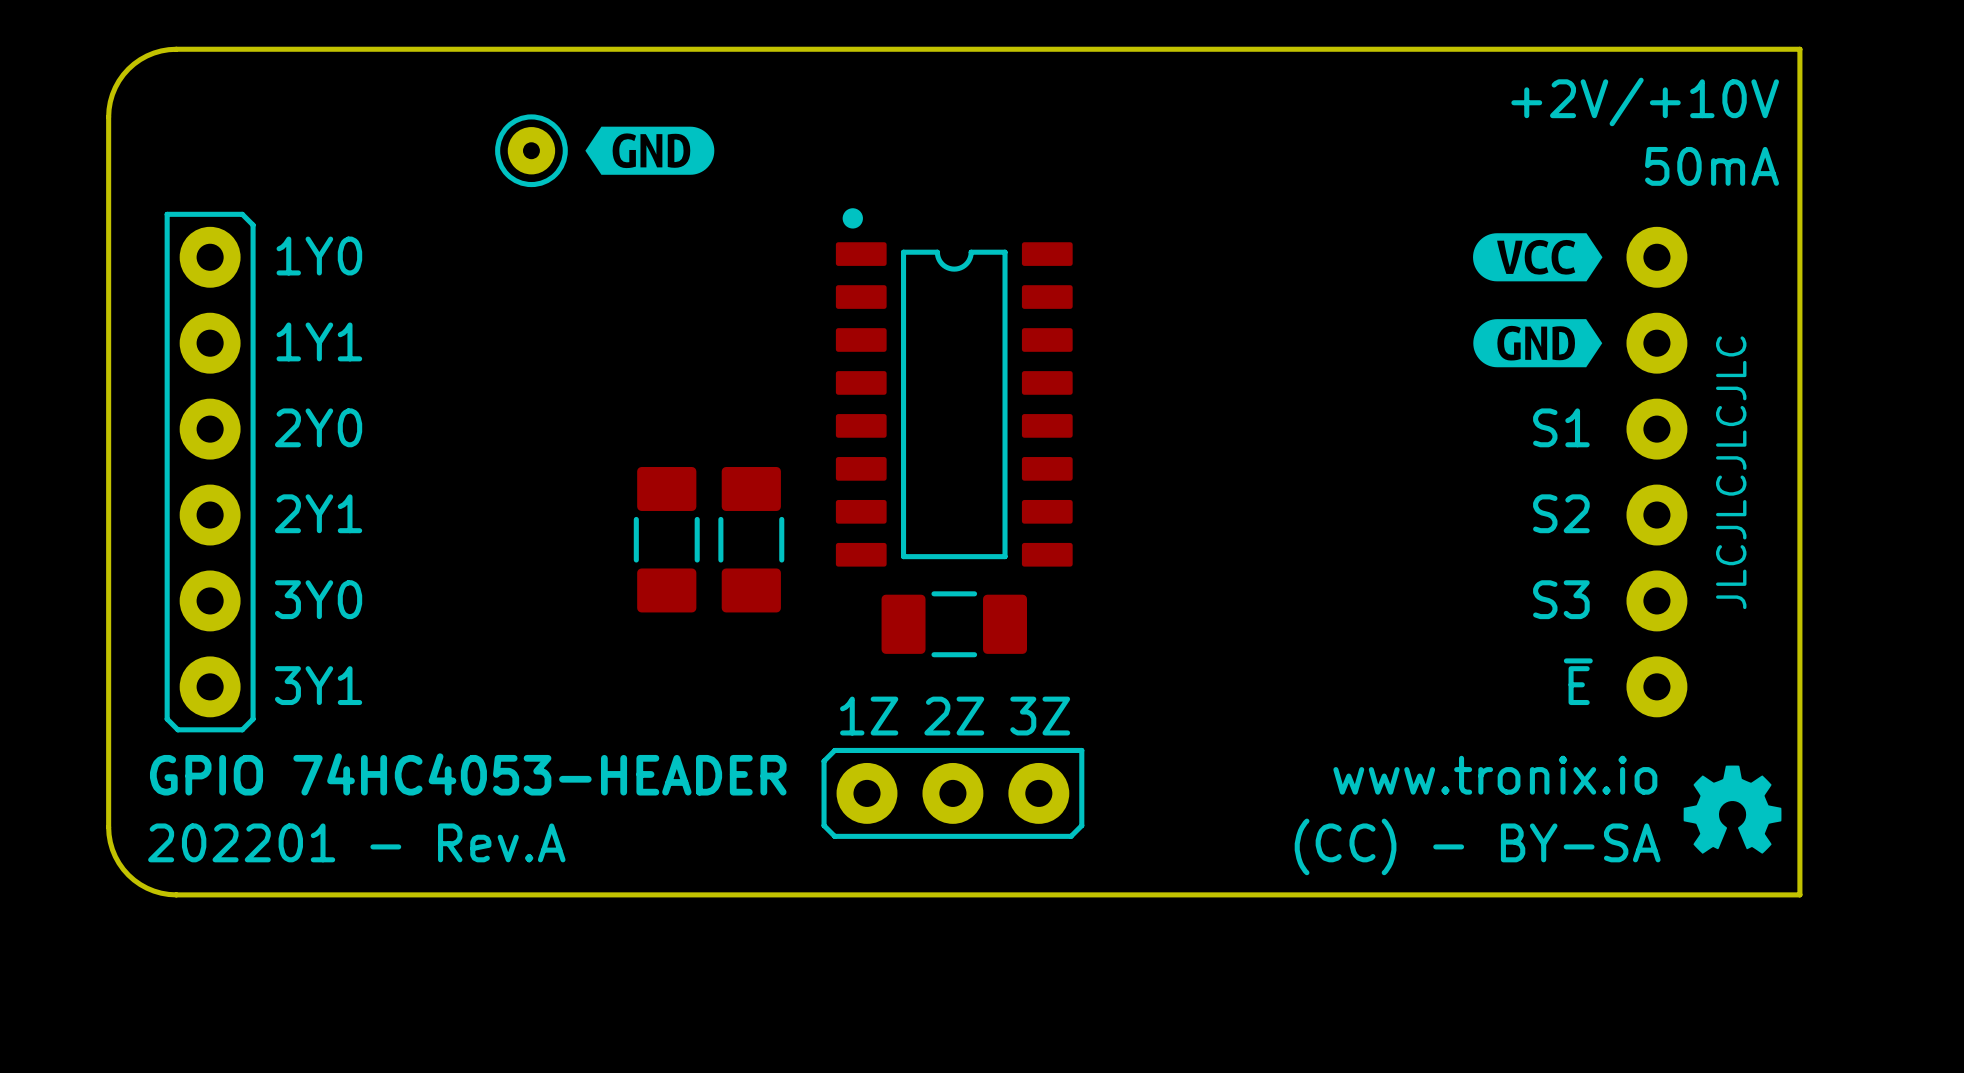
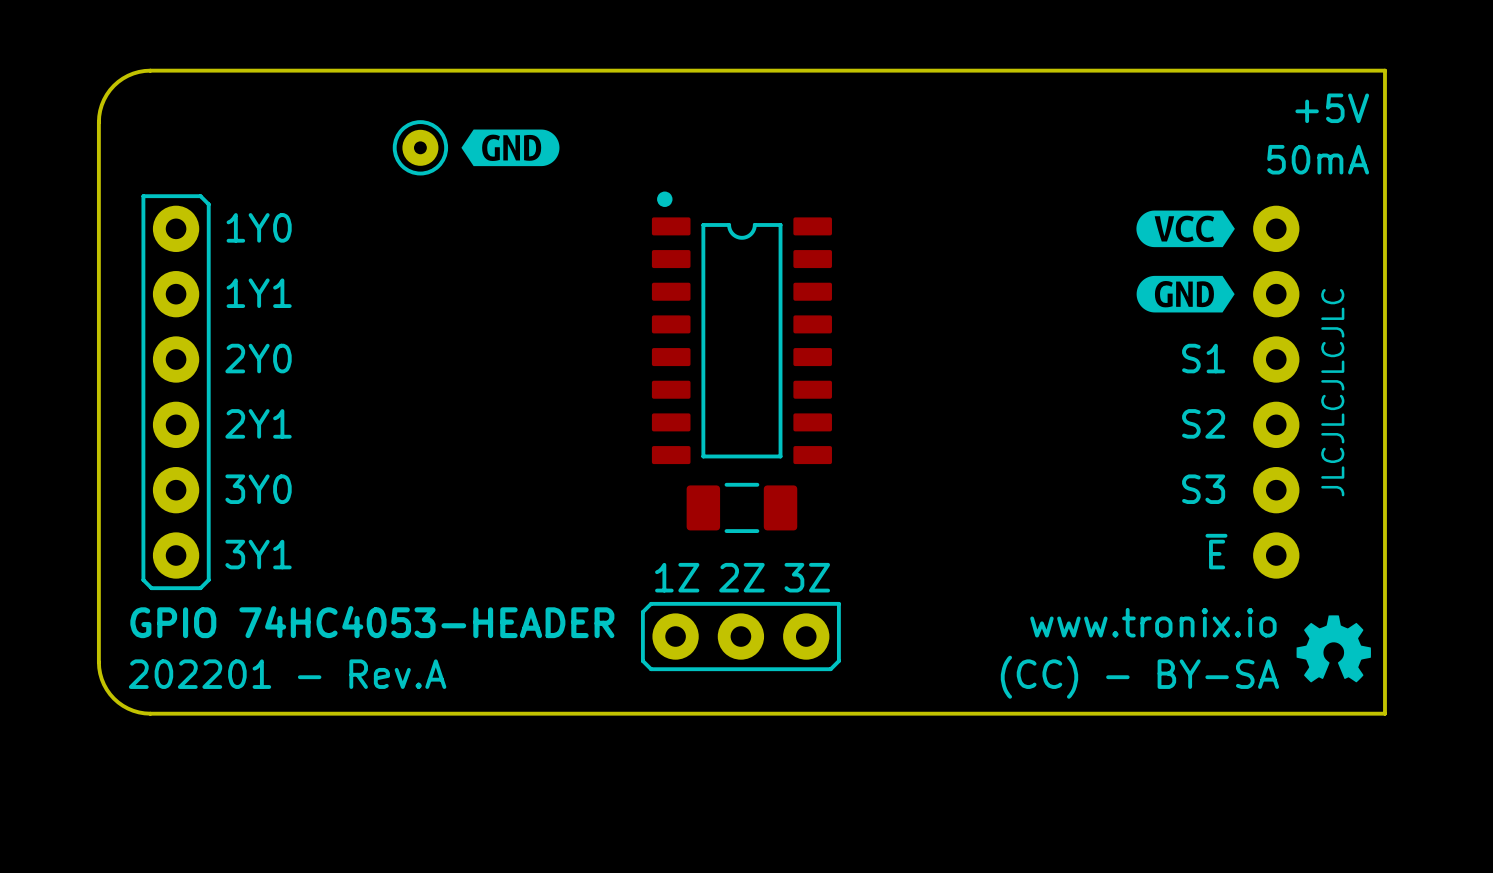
text: +2V/+10V (1645, 101) -> +5V (1332, 108)
part: (666, 539) -> none
part: (751, 539) -> none

